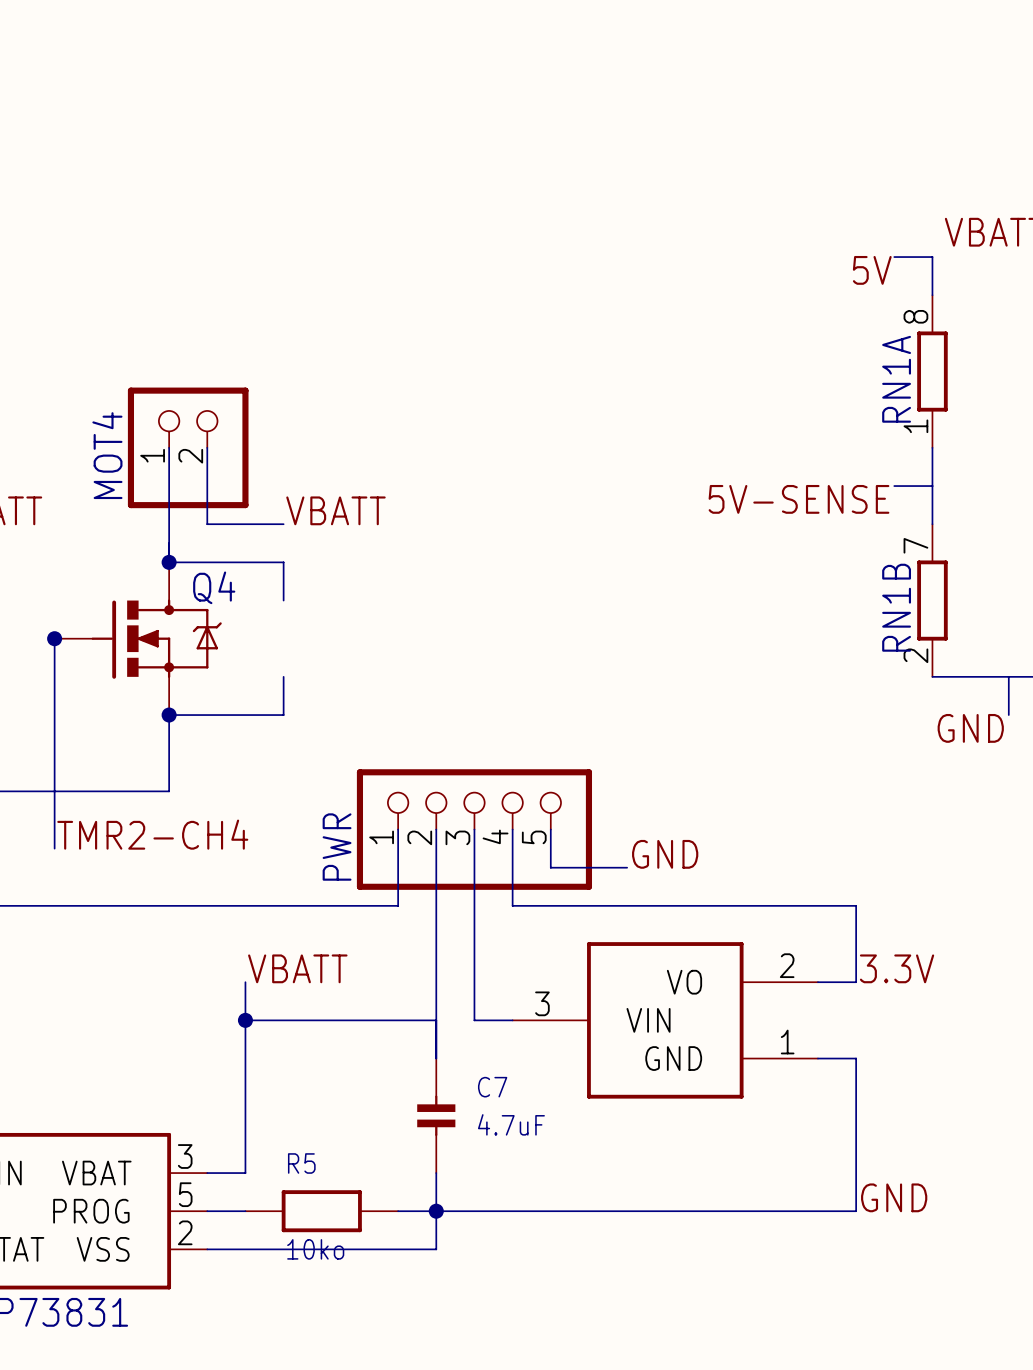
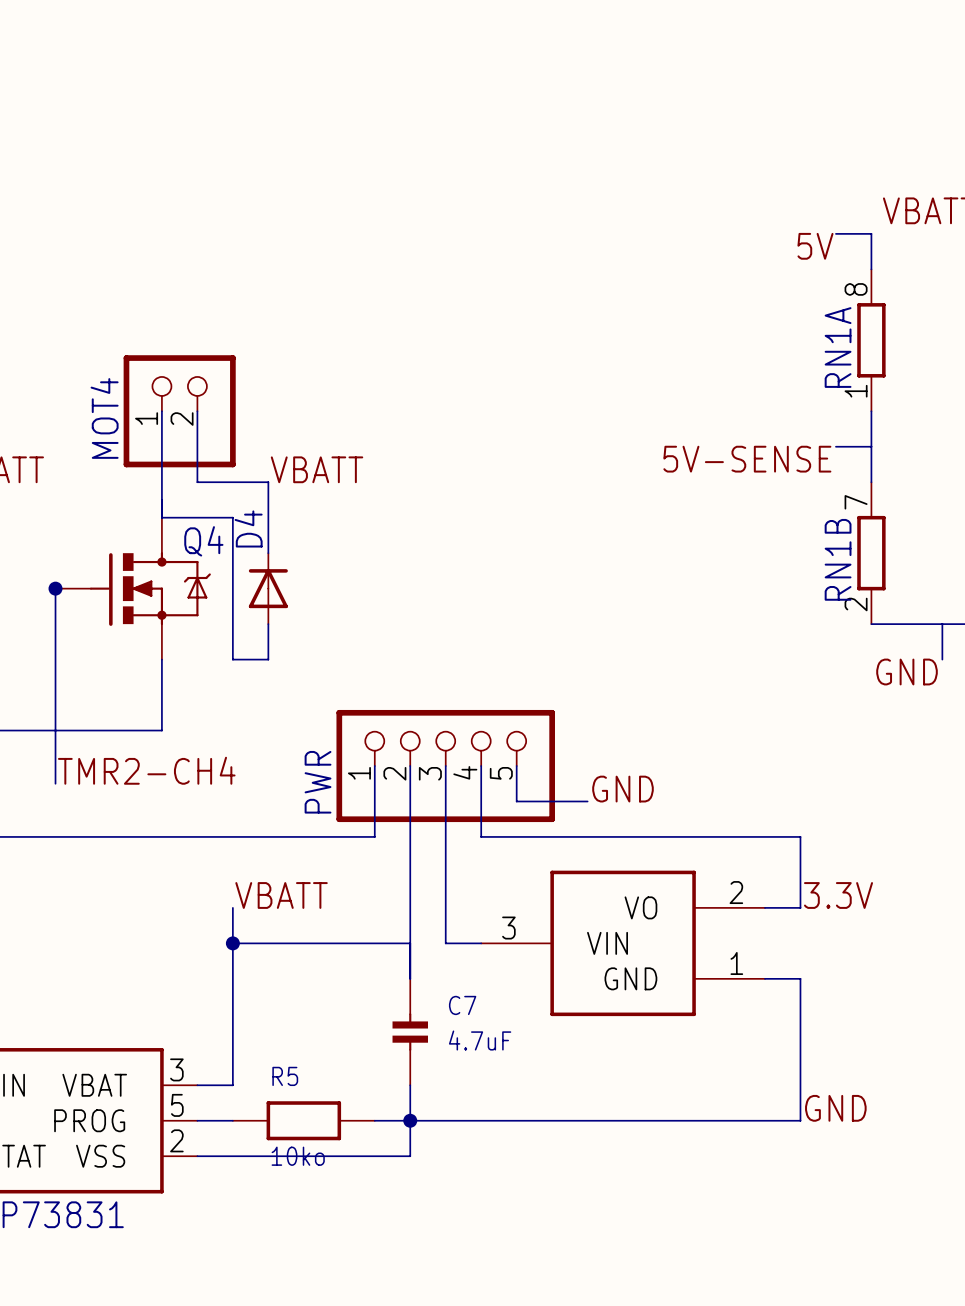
junction: (169, 562) -> none
wire: (245, 562) (283, 562) -> (268, 482) (268, 517)
D4: none -> (268, 588)
wire: (169, 715) (245, 715) -> (232, 517) (232, 659)
junction: (169, 715) -> none

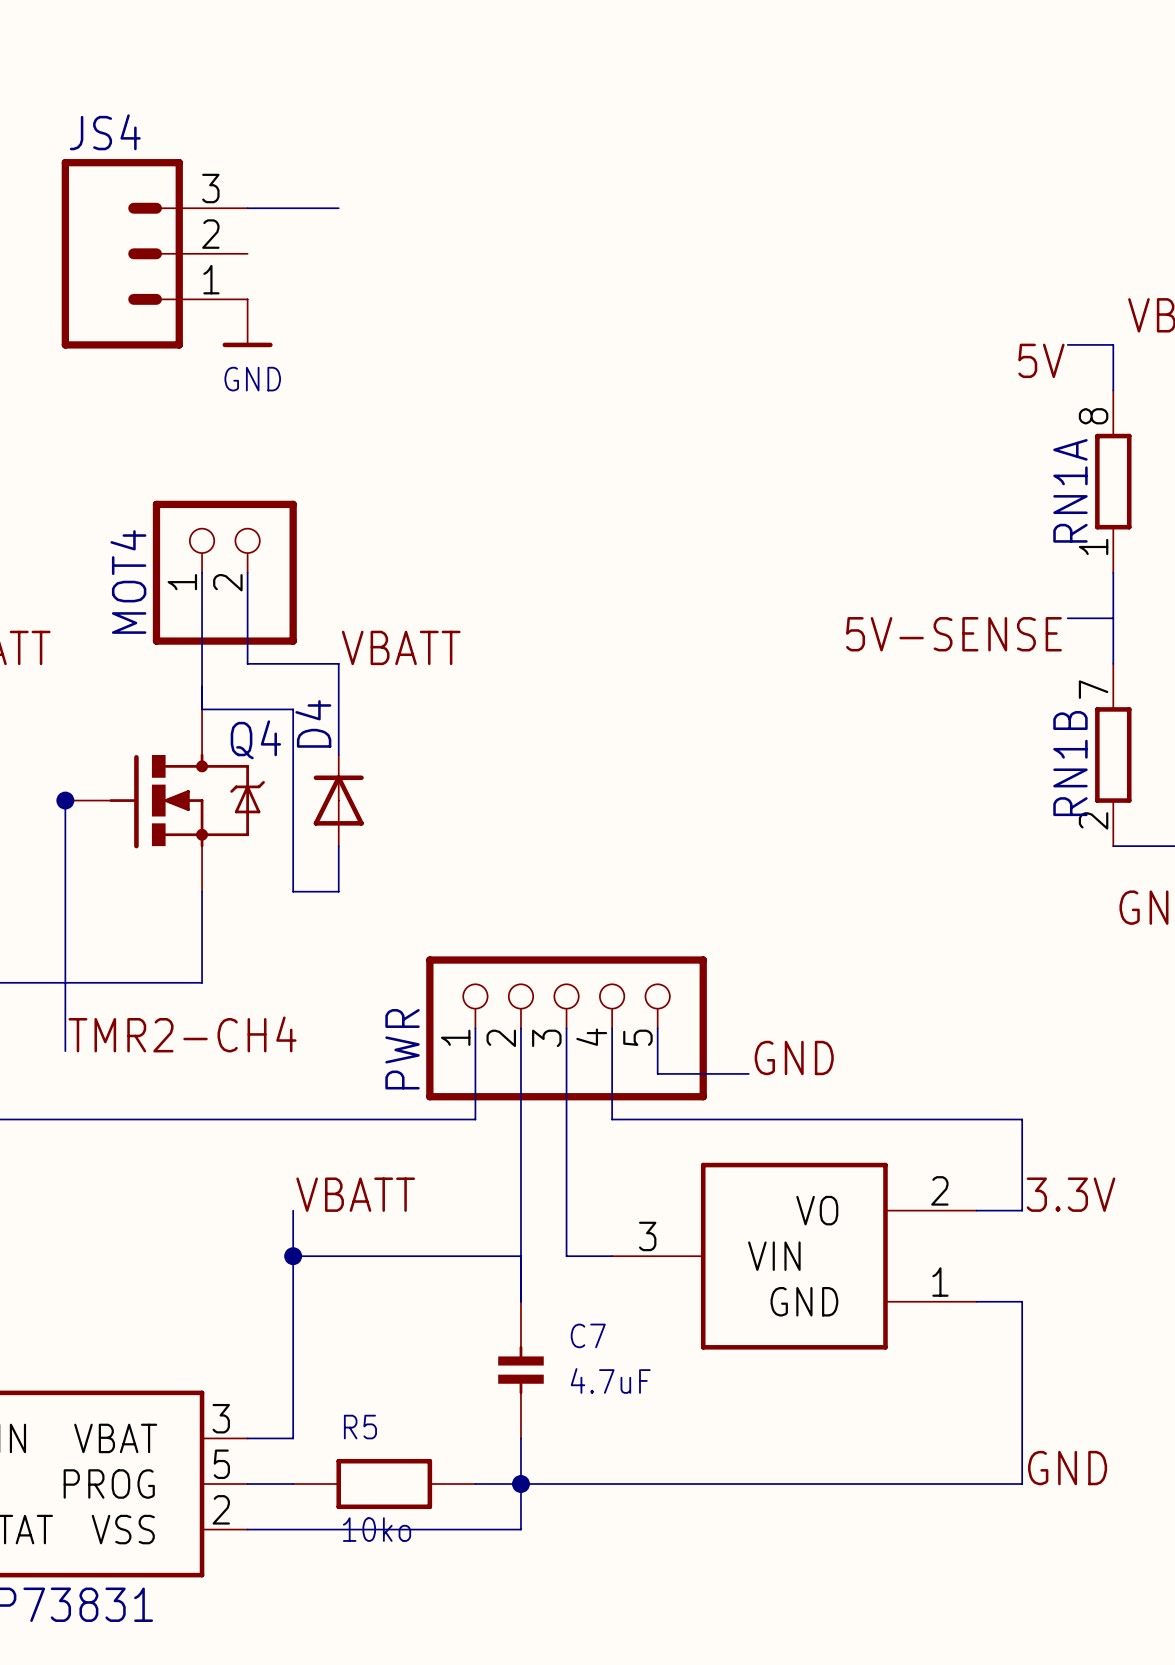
wire: none -> (247, 208) (338, 208)
JS4: none -> (154, 253)
power symbol: none -> GND (247, 323)

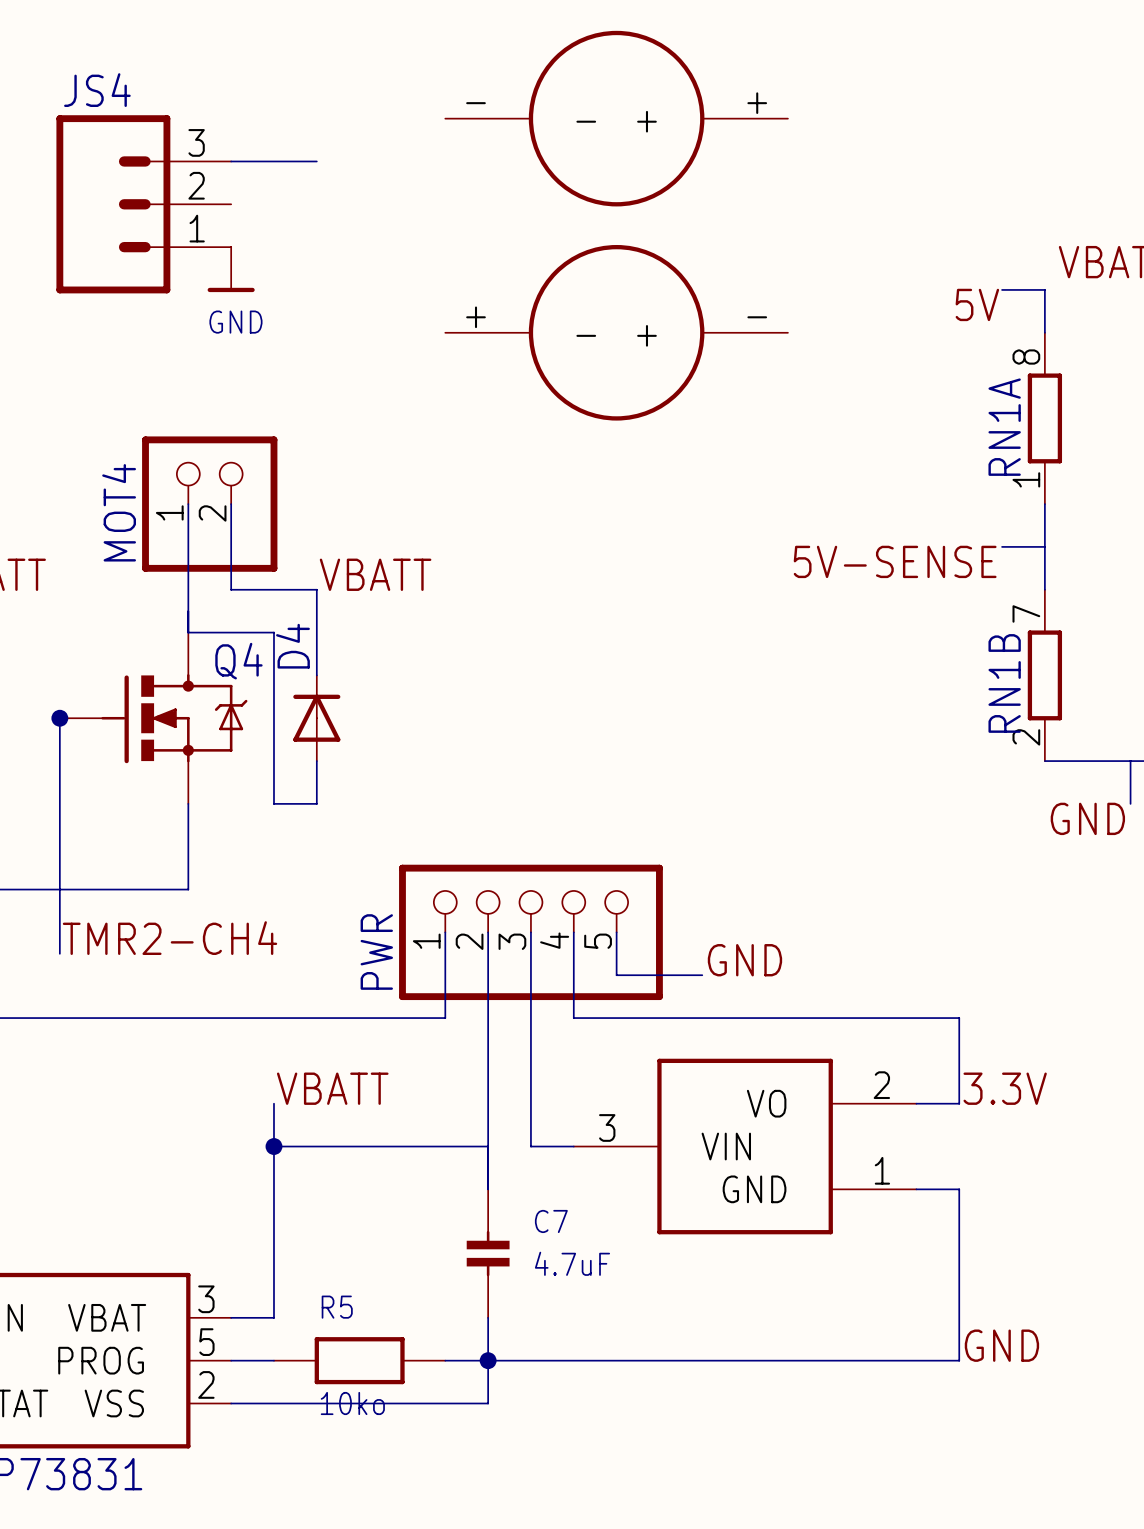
part: none -> (616, 118)
part: none -> (616, 332)

